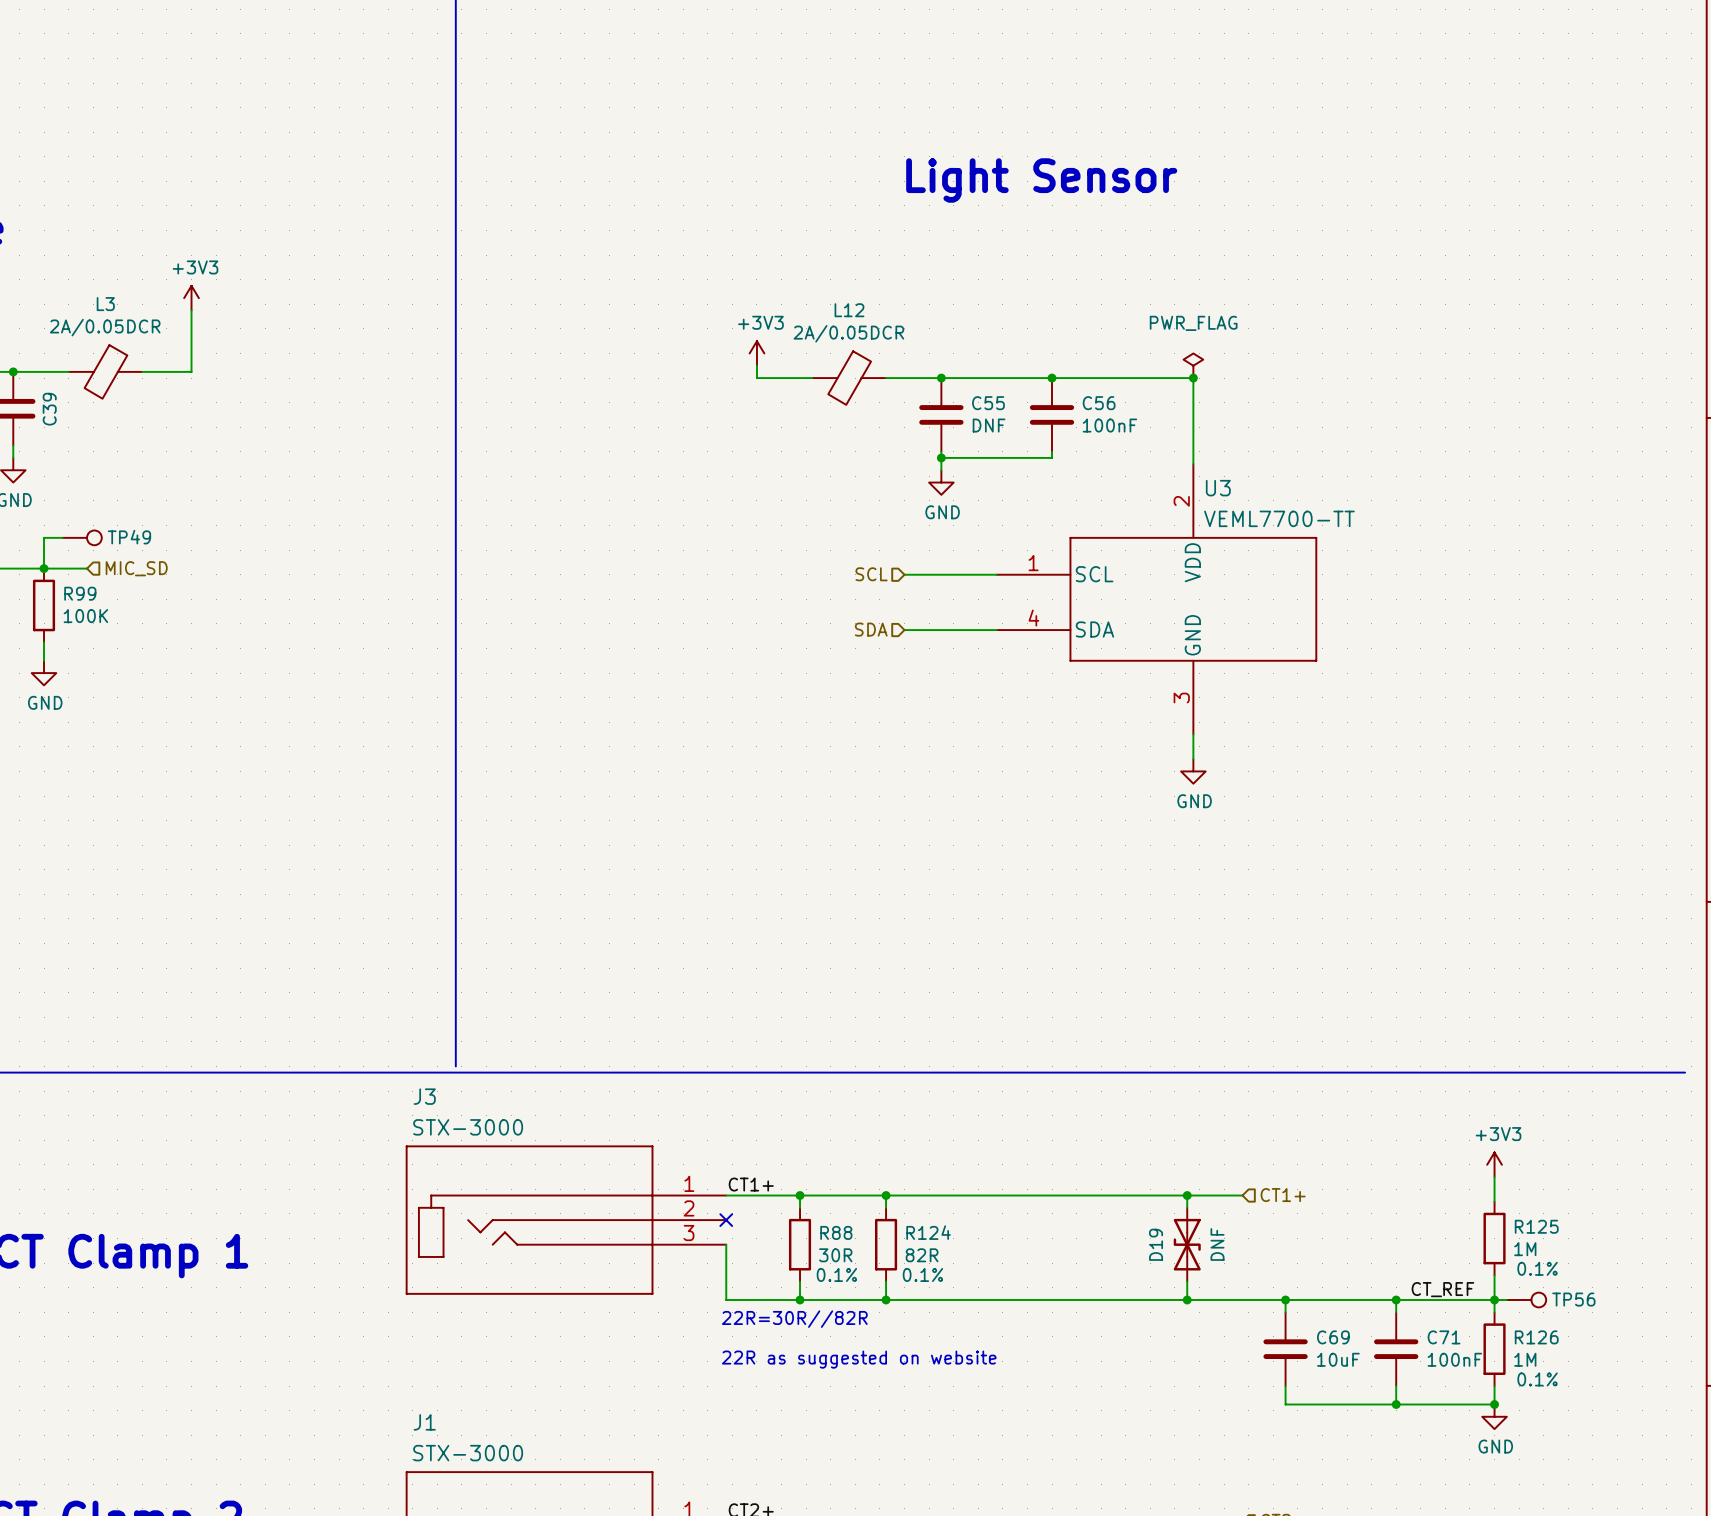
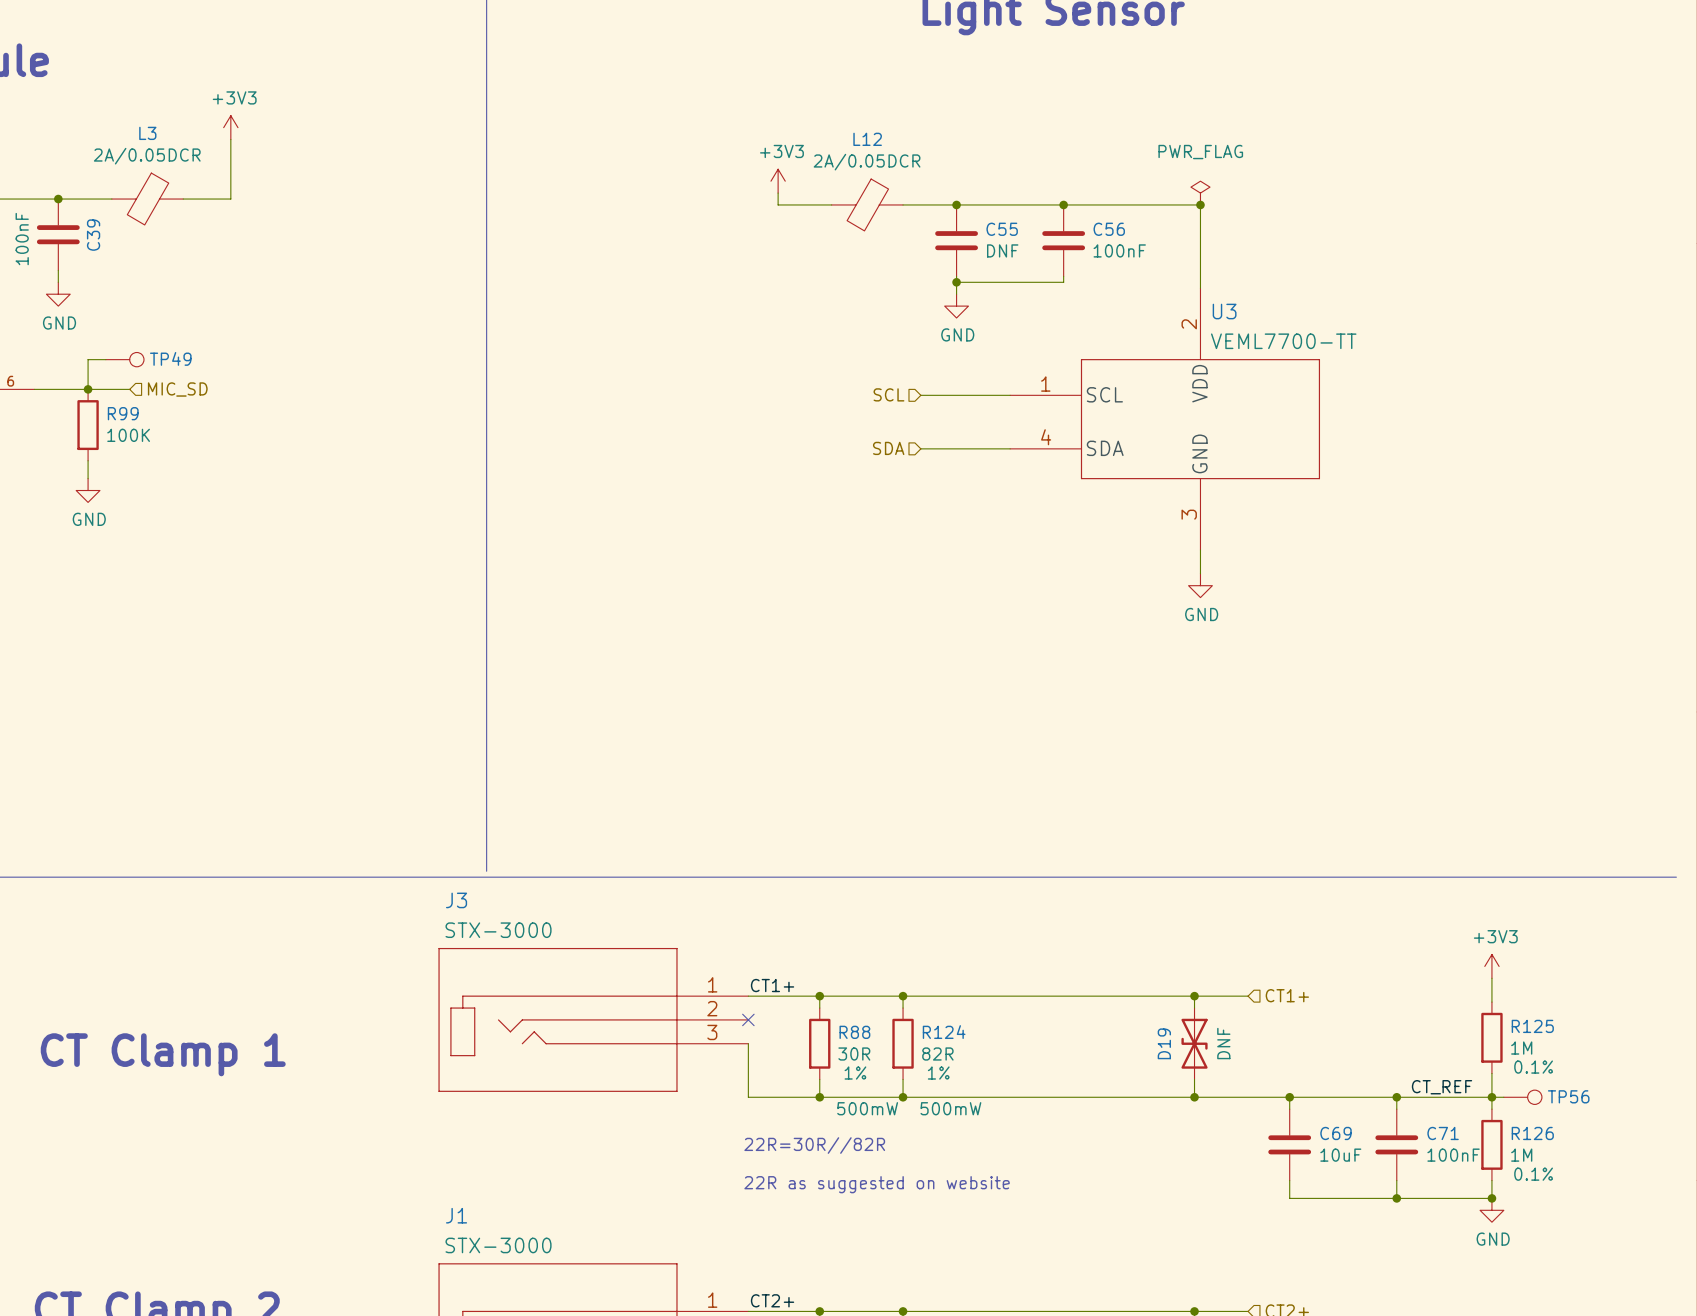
R88 text: 0.1% (836, 1274) -> 1% (855, 1073)
R124 text: 0.1% (922, 1274) -> 1% (938, 1073)
R88 text: none -> 500mW (867, 1108)
R124 text: none -> 500mW (950, 1108)
text: 22R=30R//82R (794, 1319) -> none
text: 22R as suggested on website (859, 1359) -> 22R=30R//82R (814, 1145)
text: none -> 22R as suggested on website (877, 1184)

